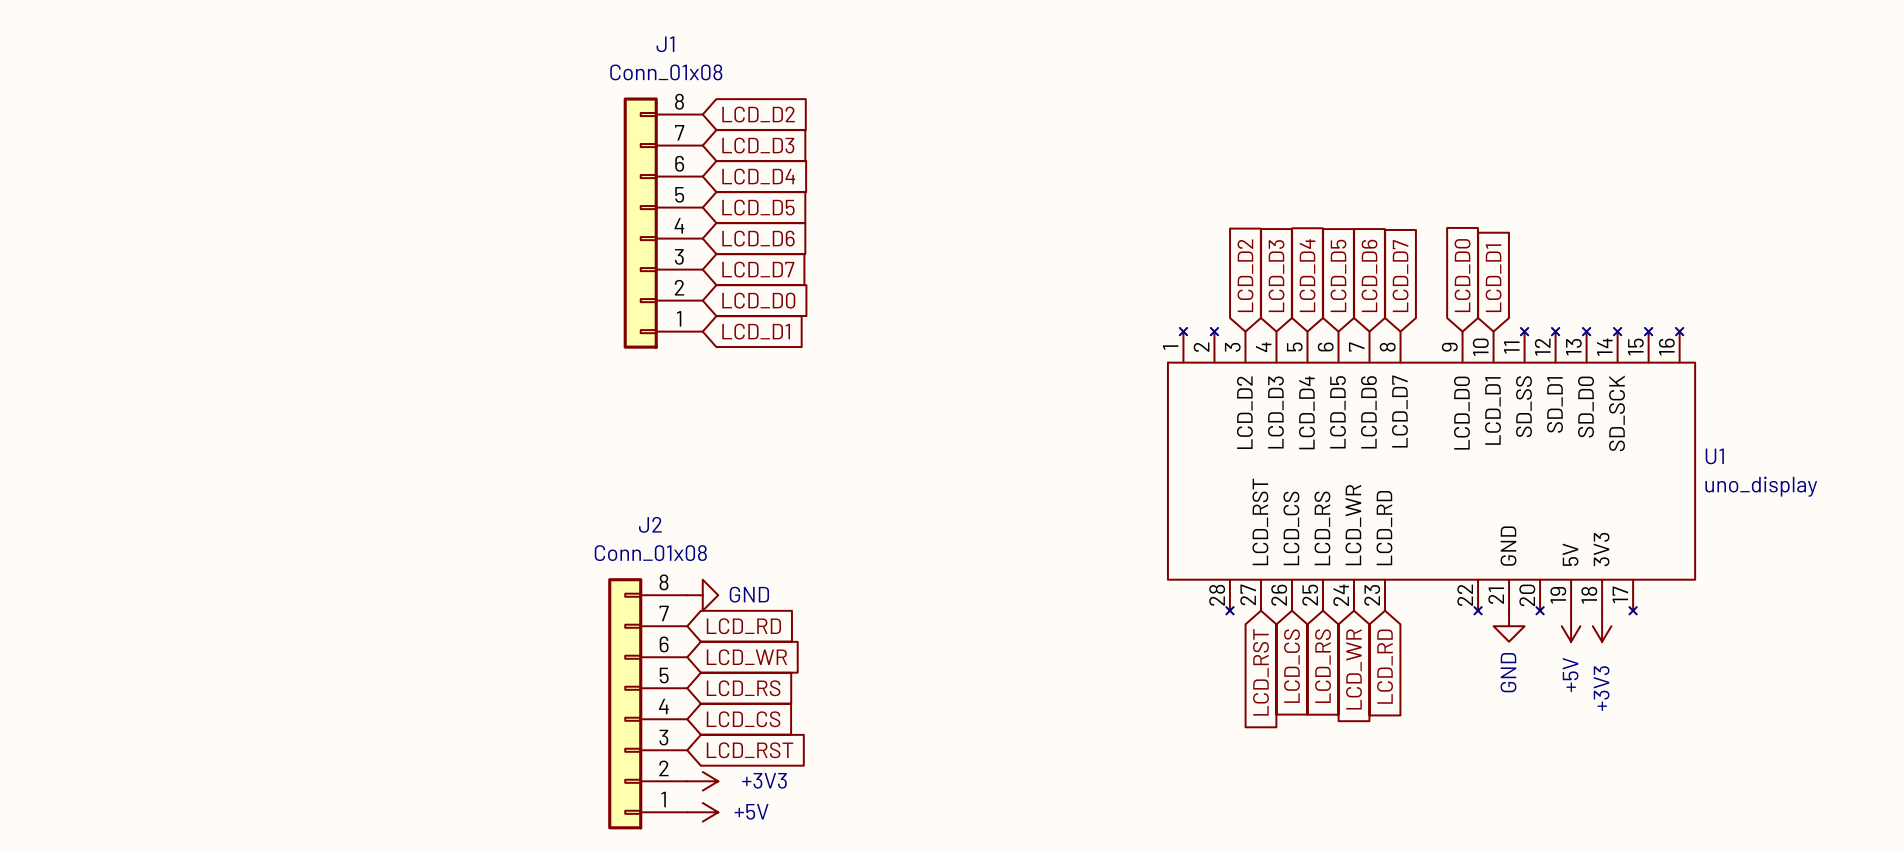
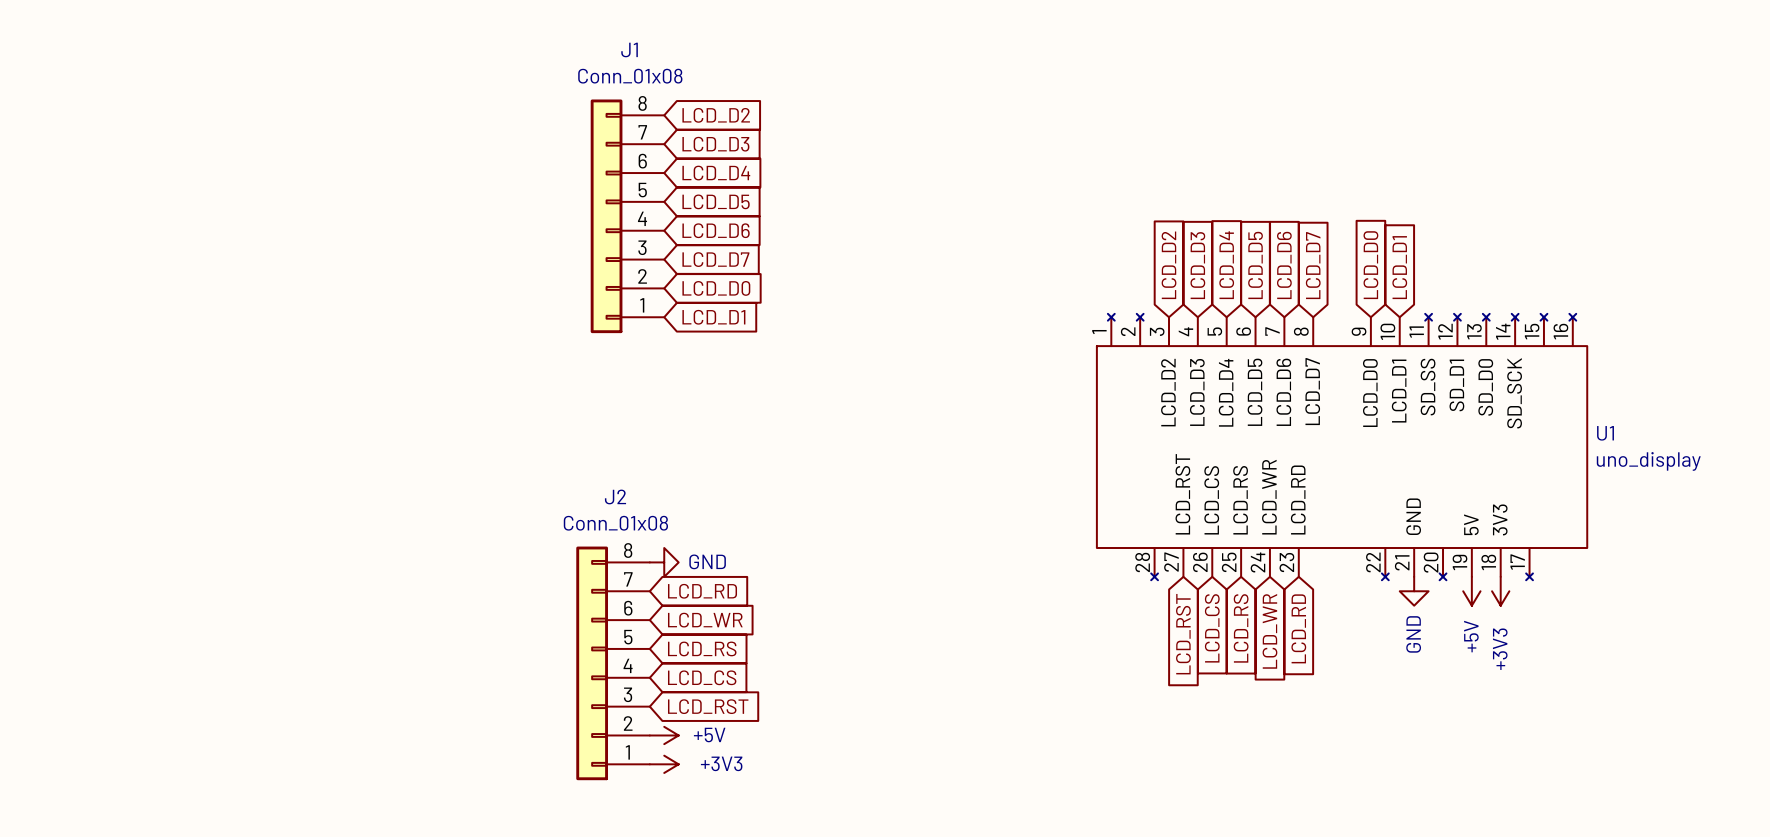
power symbol: +3V3 (702, 781) -> +5V (664, 735)
power symbol: +5V (702, 812) -> +3V3 (664, 764)

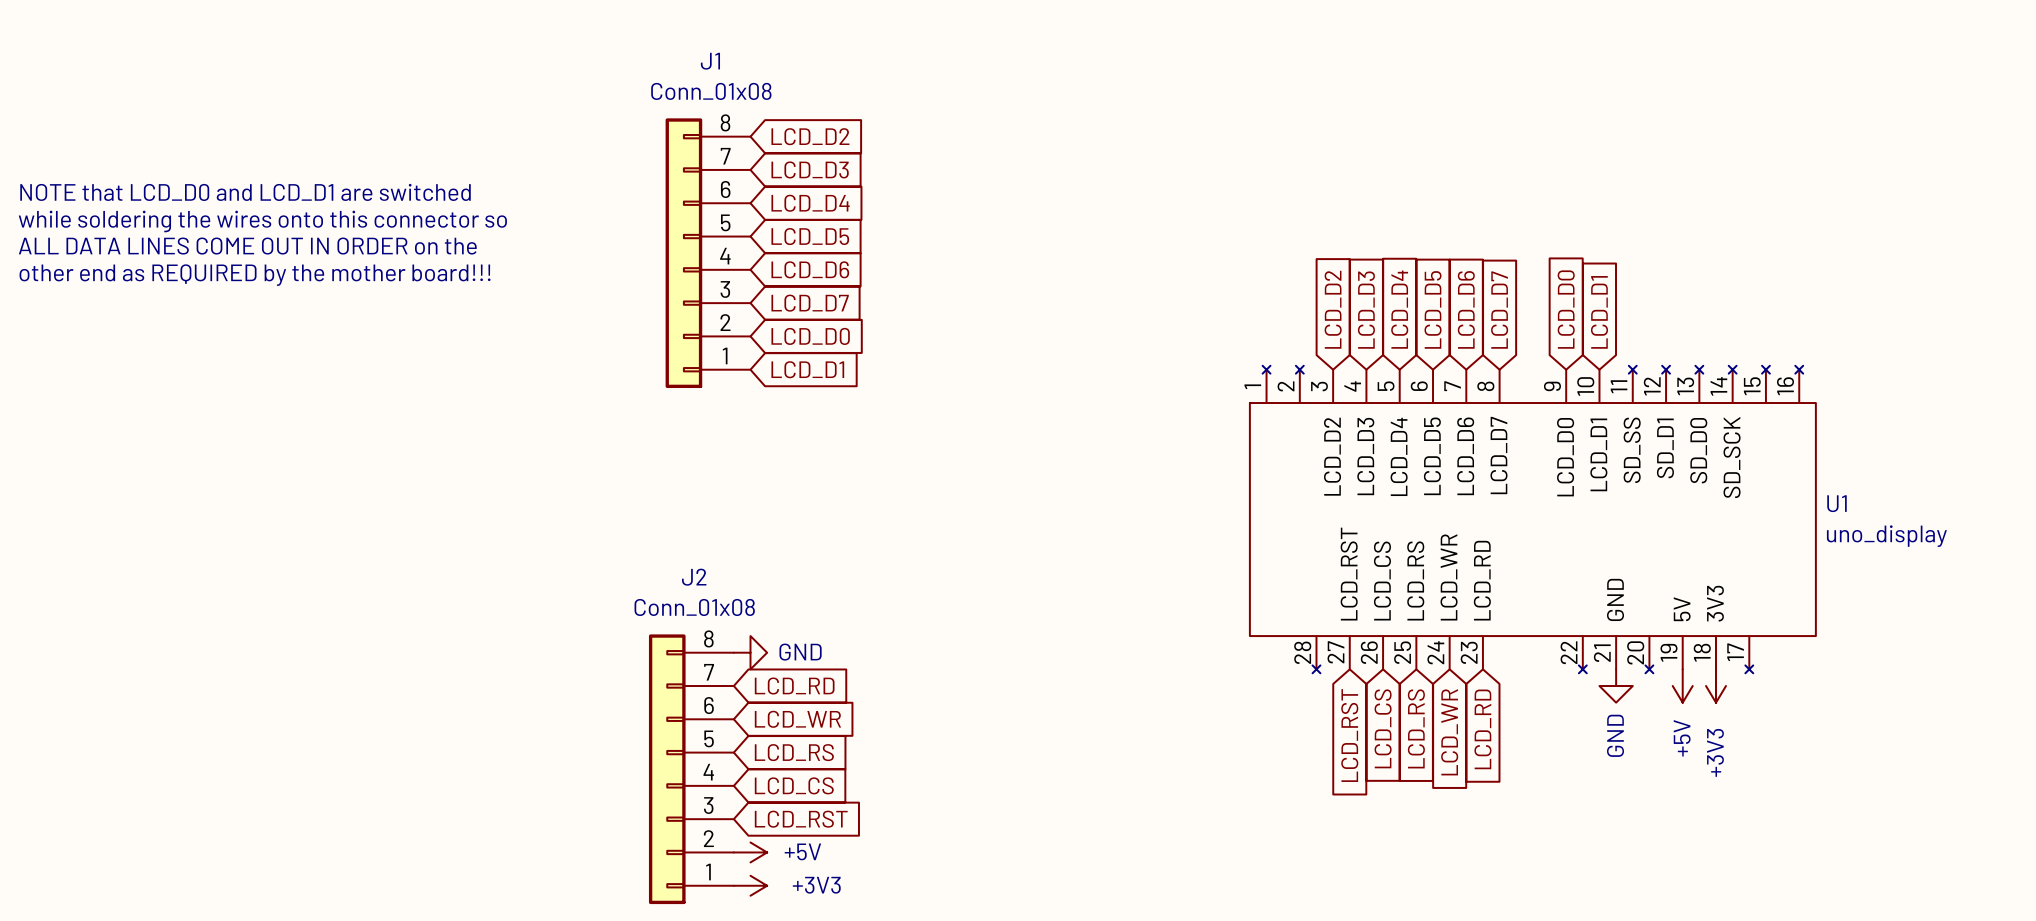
text: none -> NOTE that LCD_D0 and LCD_D1 are switched (245, 192)
text: none -> while soldering the wires onto this connector so (262, 221)
text: none -> ALL DATA LINES COME OUT IN ORDER on the (247, 246)
text: none -> other end as REQUIRED by the mother board!!! (255, 275)

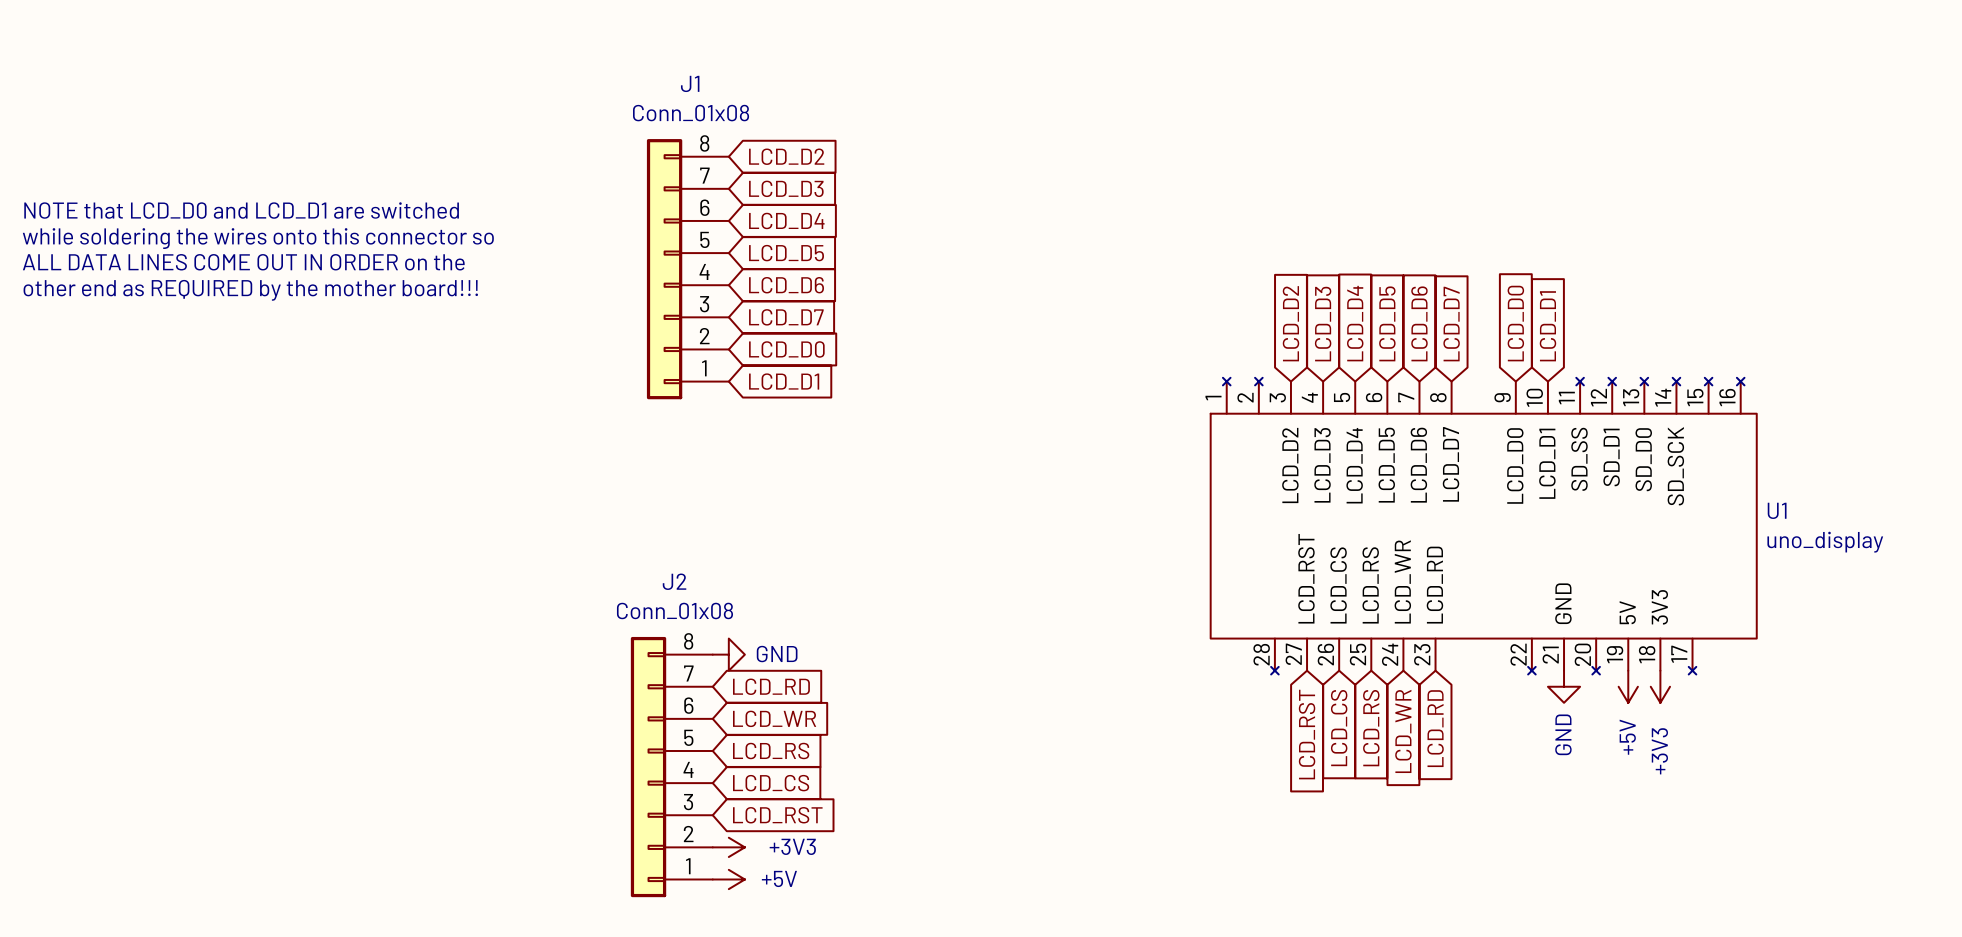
power symbol: +5V (750, 852) -> +3V3 (728, 847)
power symbol: +3V3 (750, 885) -> +5V (728, 879)

